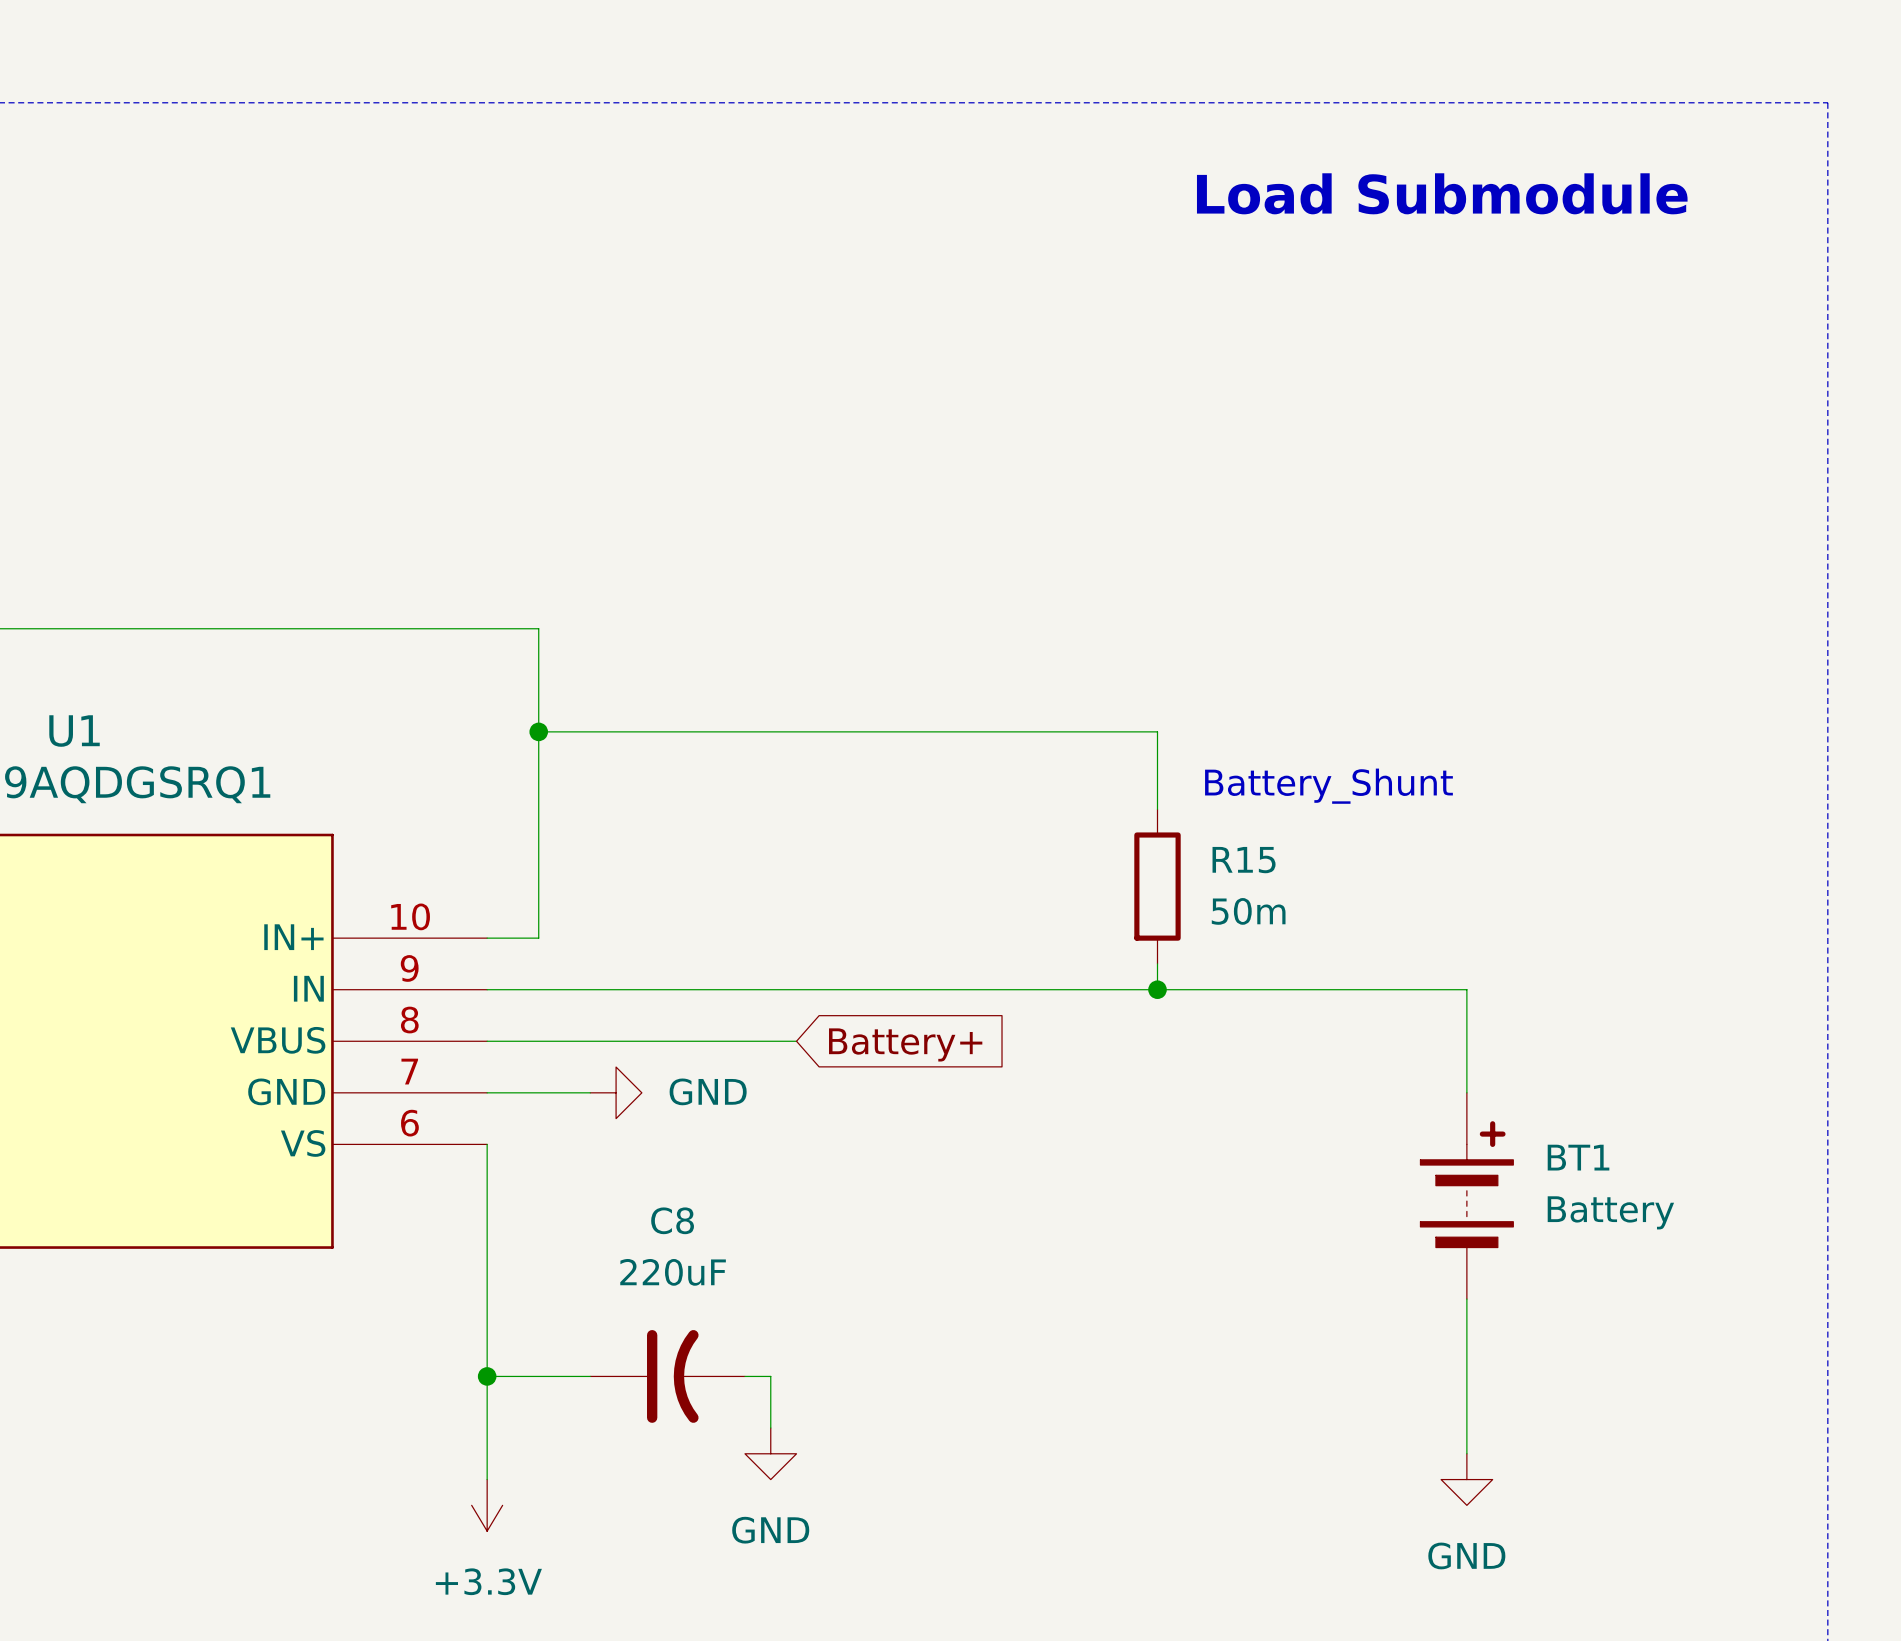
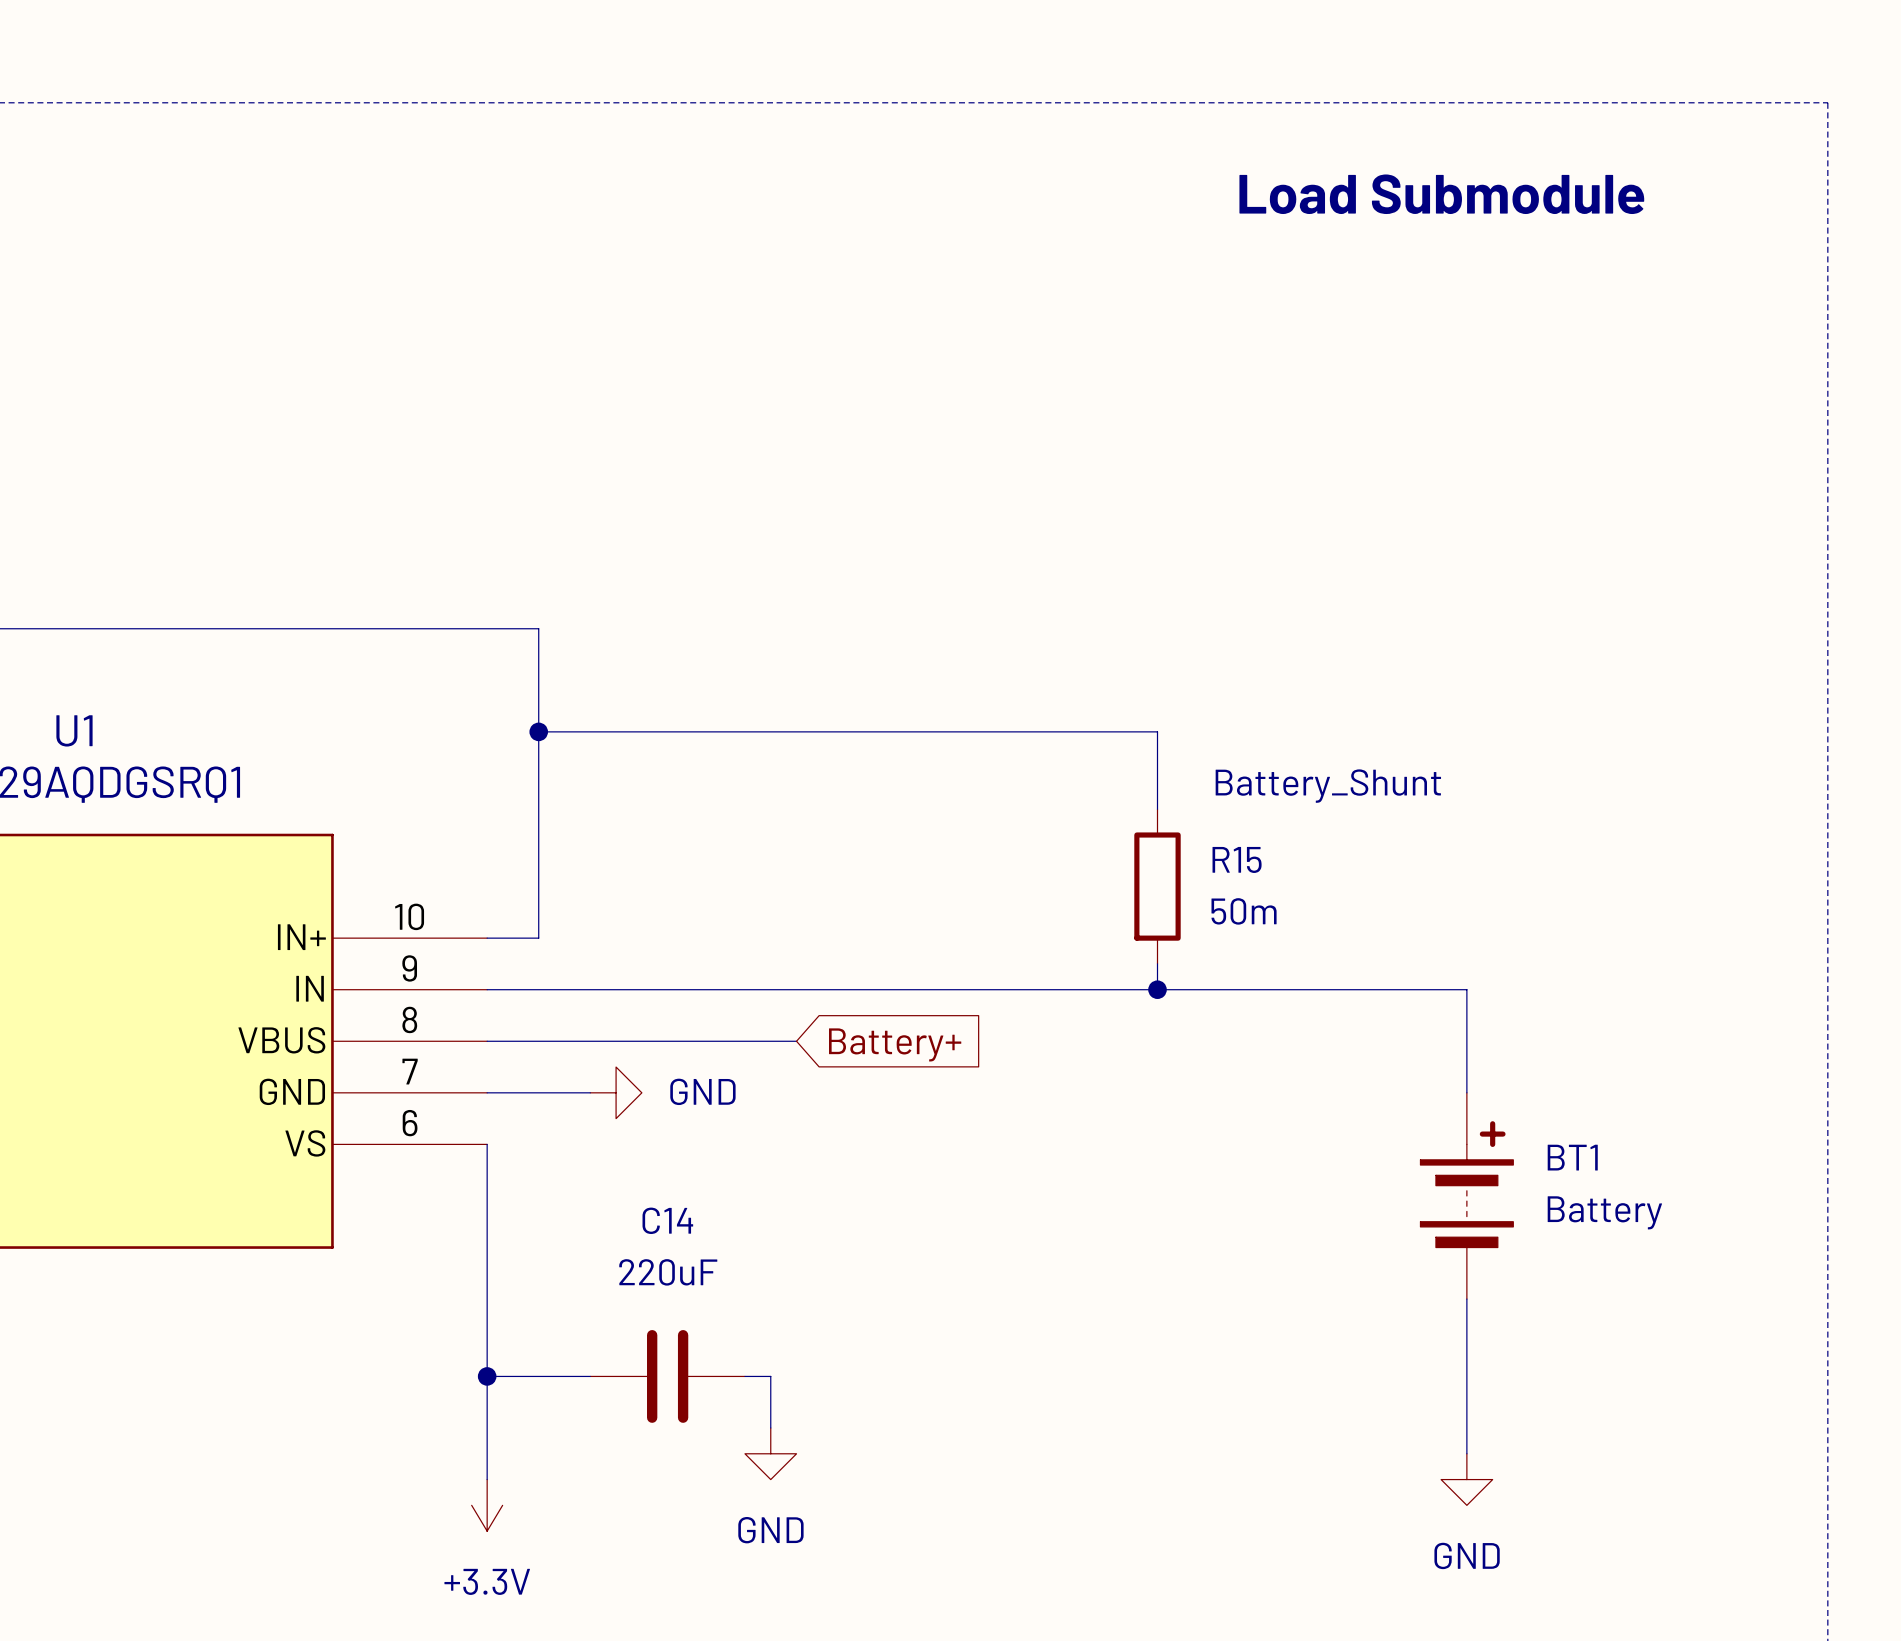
C8: 220uF (667, 1376) -> none
C14: none -> 220uF (667, 1376)

